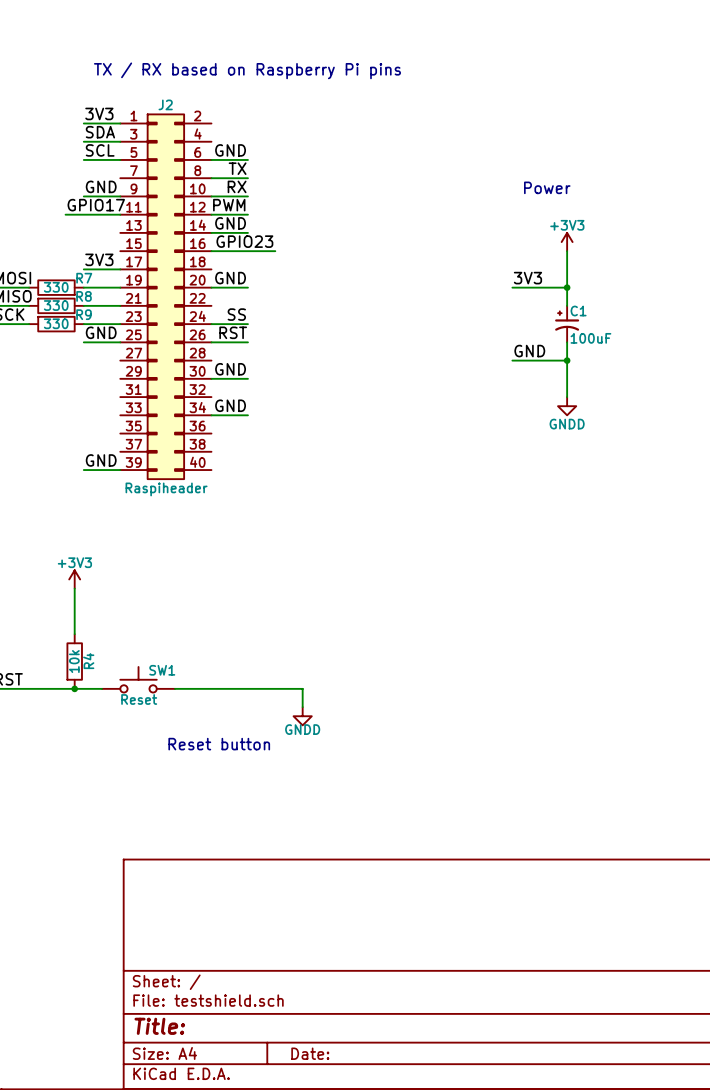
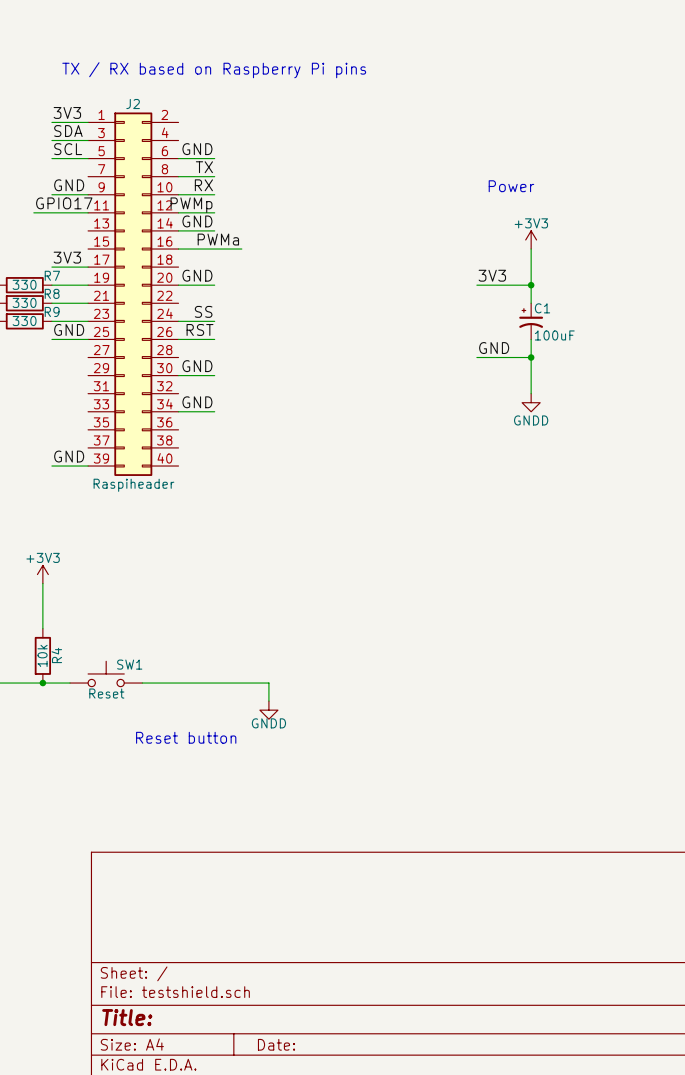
label: PWM (229, 205) -> PWMp (191, 205)
label: GPIO23 (244, 241) -> PWMa (218, 239)

